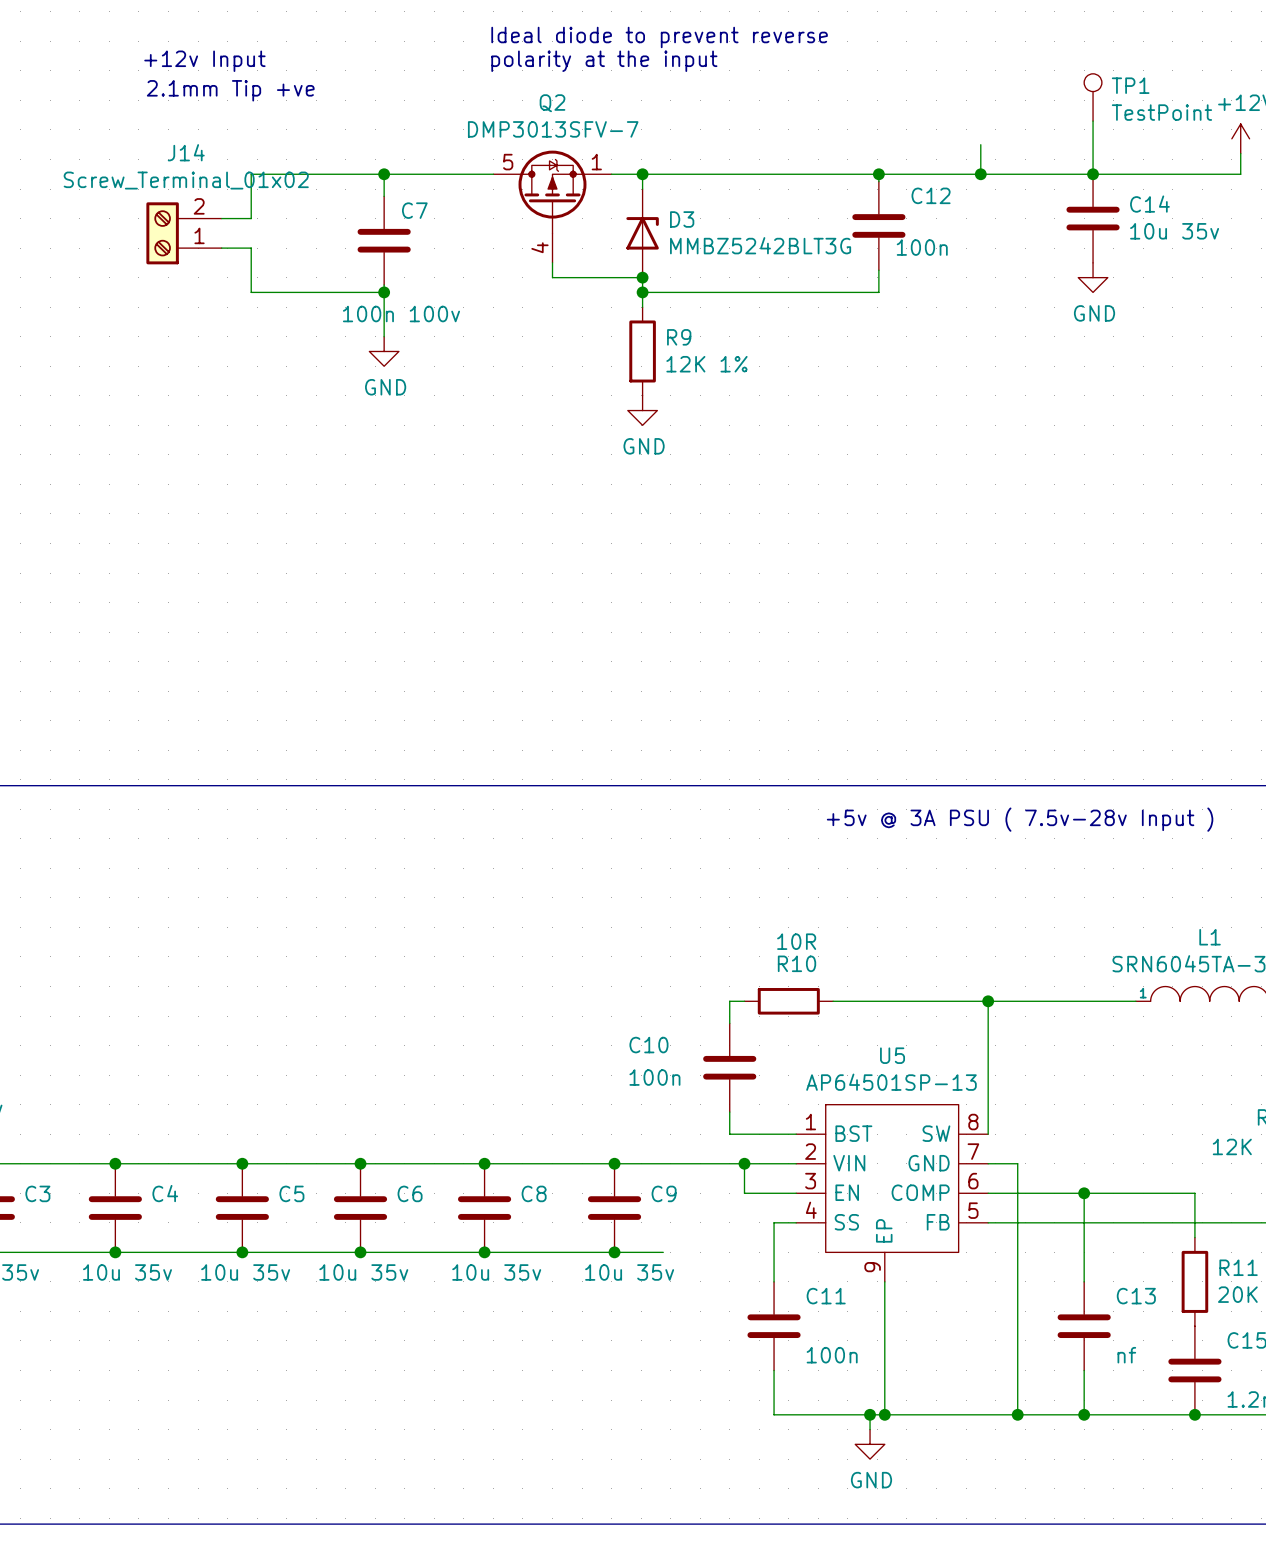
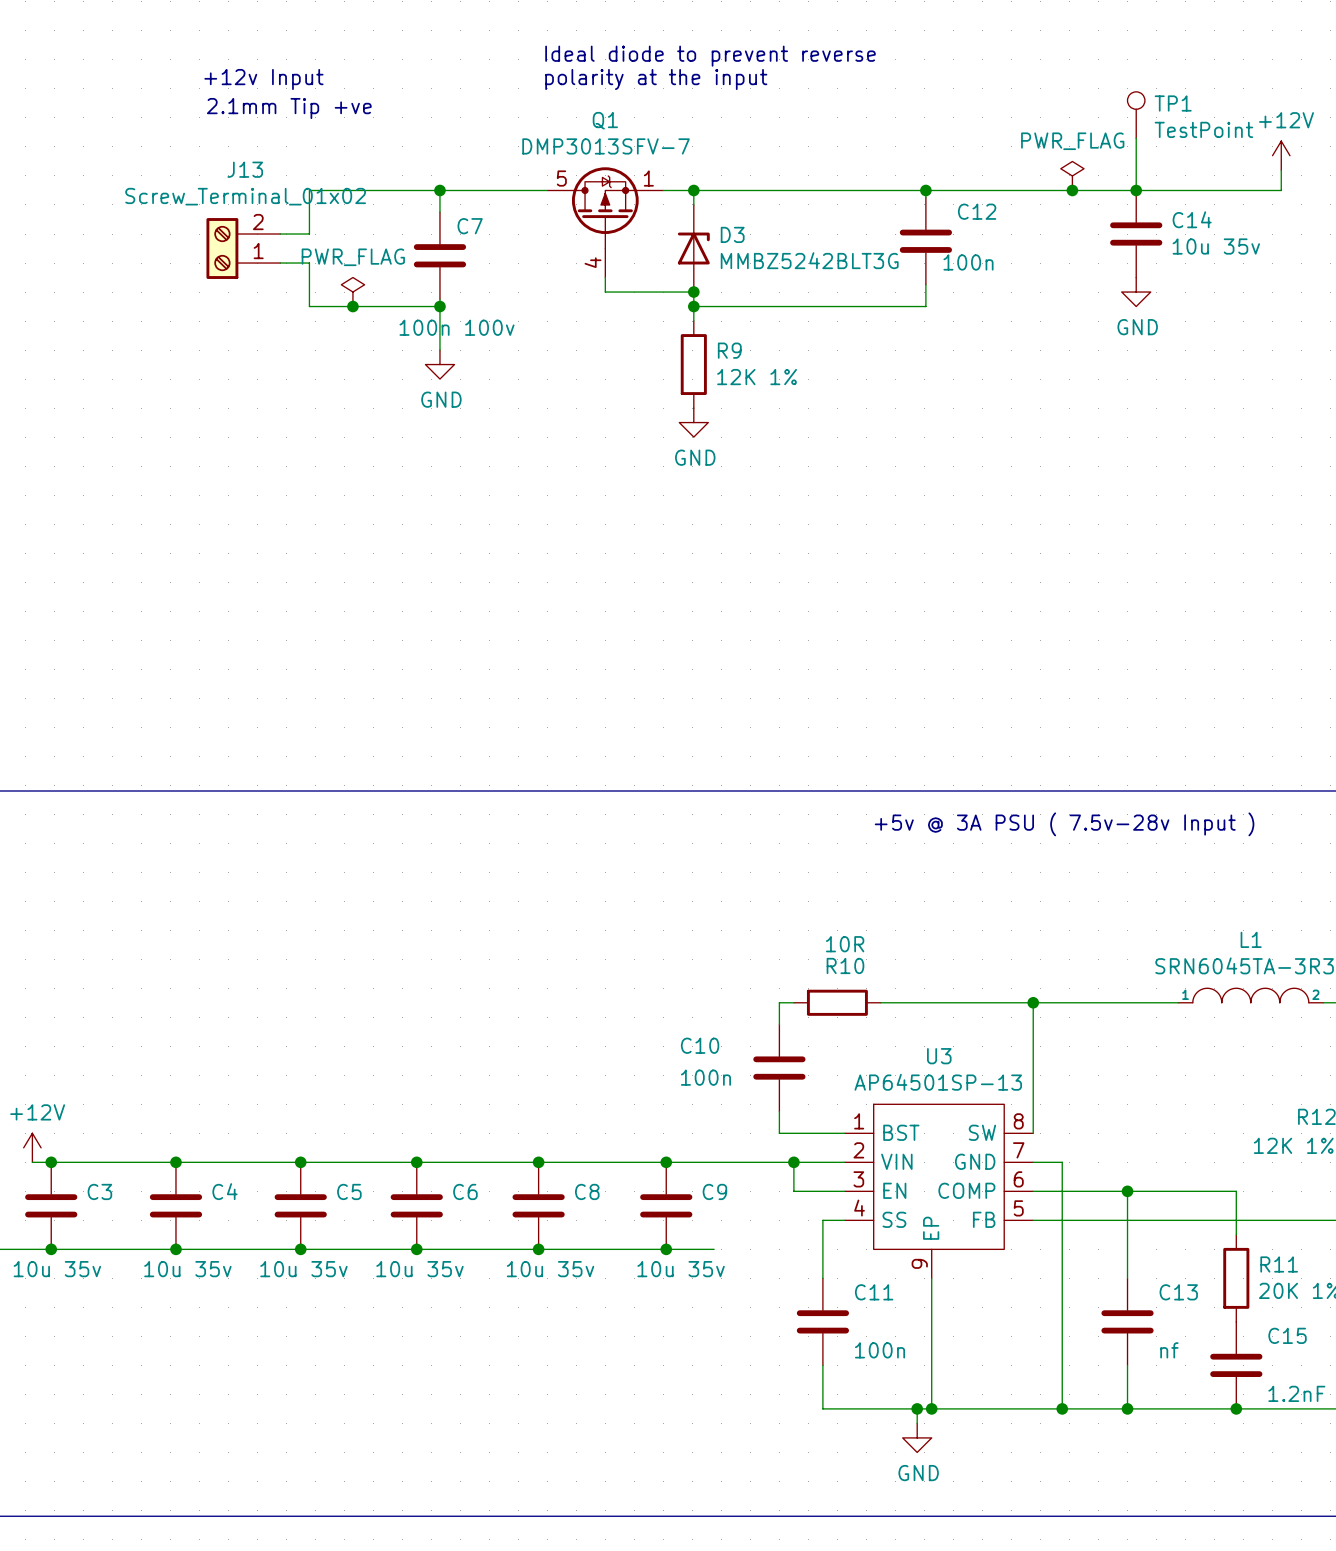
Q2 name: Q2 (552, 103) -> Q1 (605, 120)
wire: (980, 144) (980, 174) -> none
J14 name: J14 (186, 152) -> J13 (245, 169)
power symbol: none -> PWR_FLAG (1072, 175)
junction position: (980, 174) -> (1072, 190)
power symbol: none -> PWR_FLAG (352, 292)
junction: none -> (352, 306)
U5 name: U5 (892, 1055) -> U3 (939, 1056)

